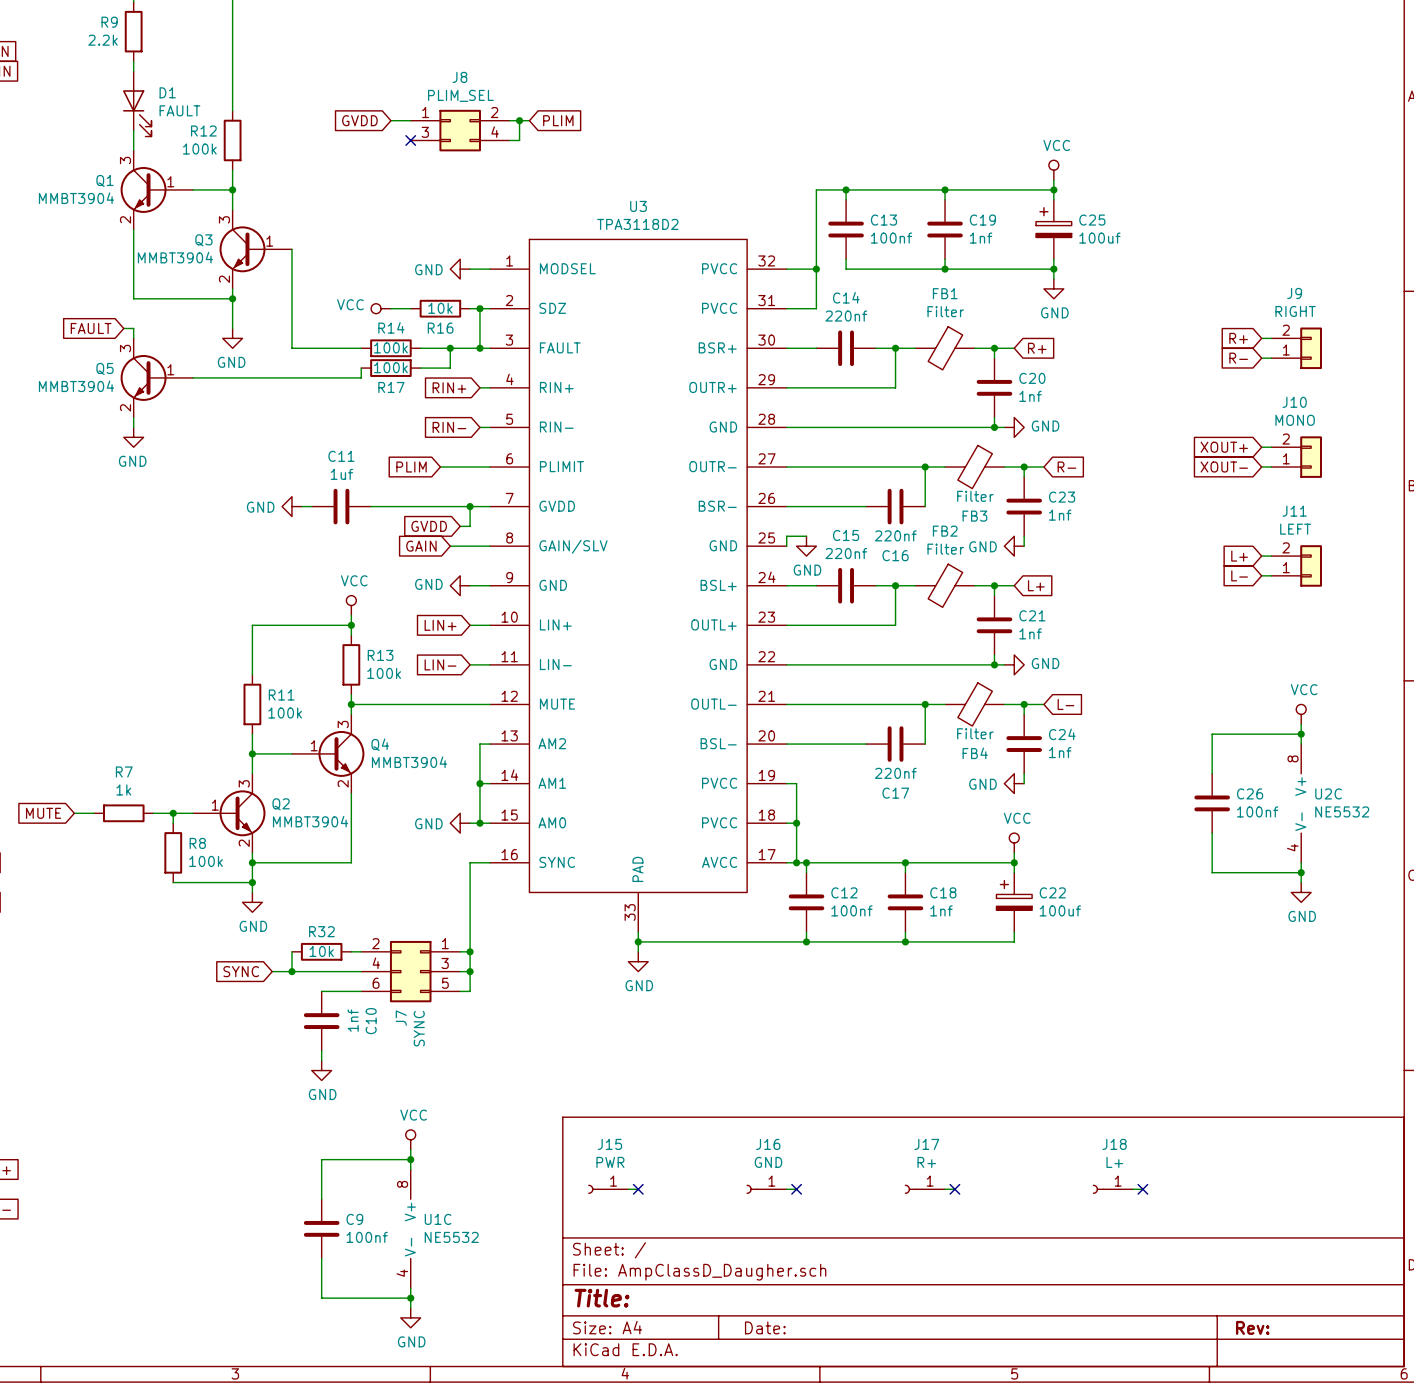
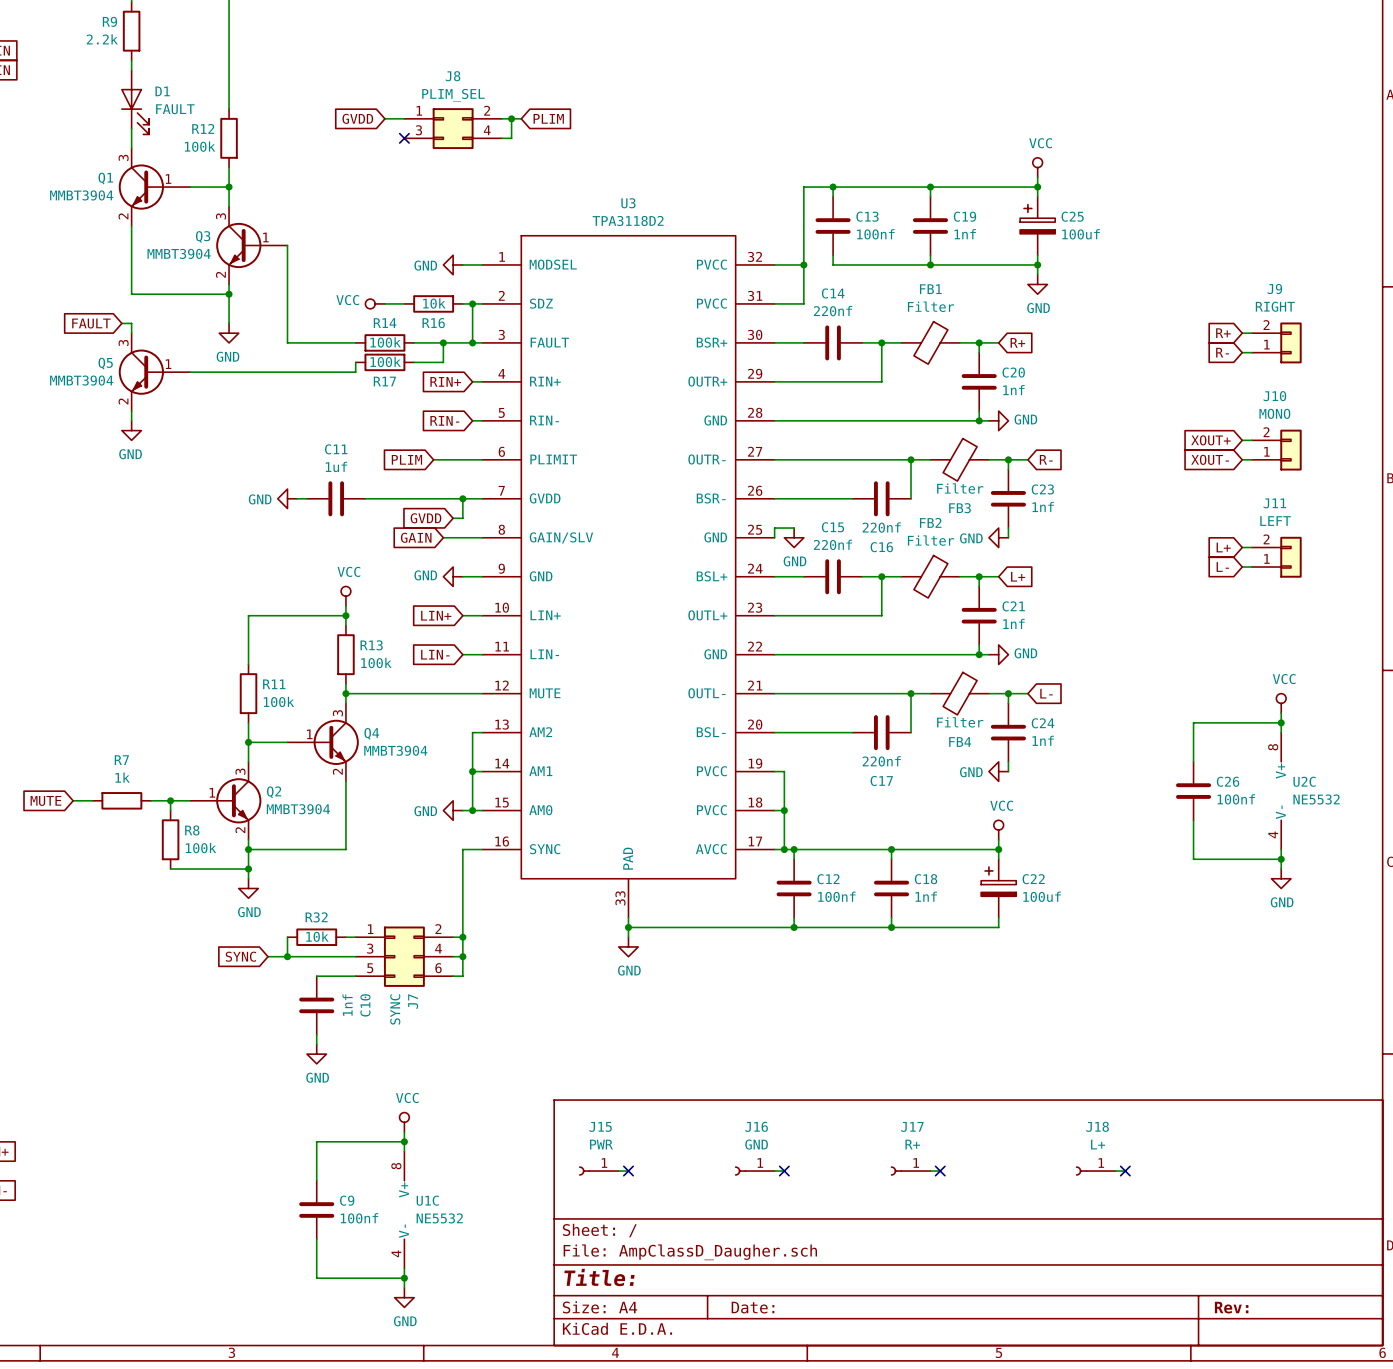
J7 flip: as is (410, 971) -> left-right (404, 956)

